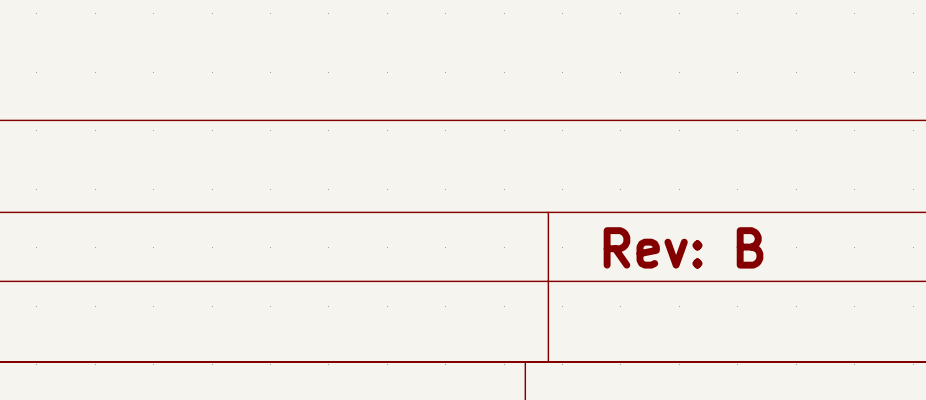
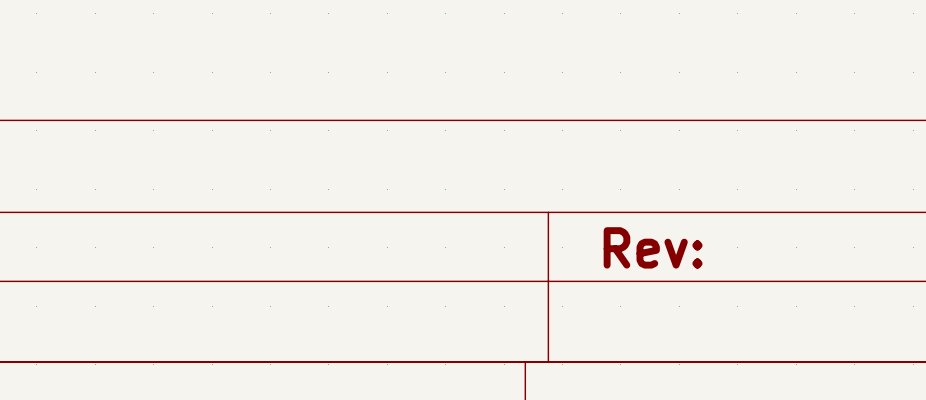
title block: Rev: B (683, 247) -> Rev: (653, 247)

